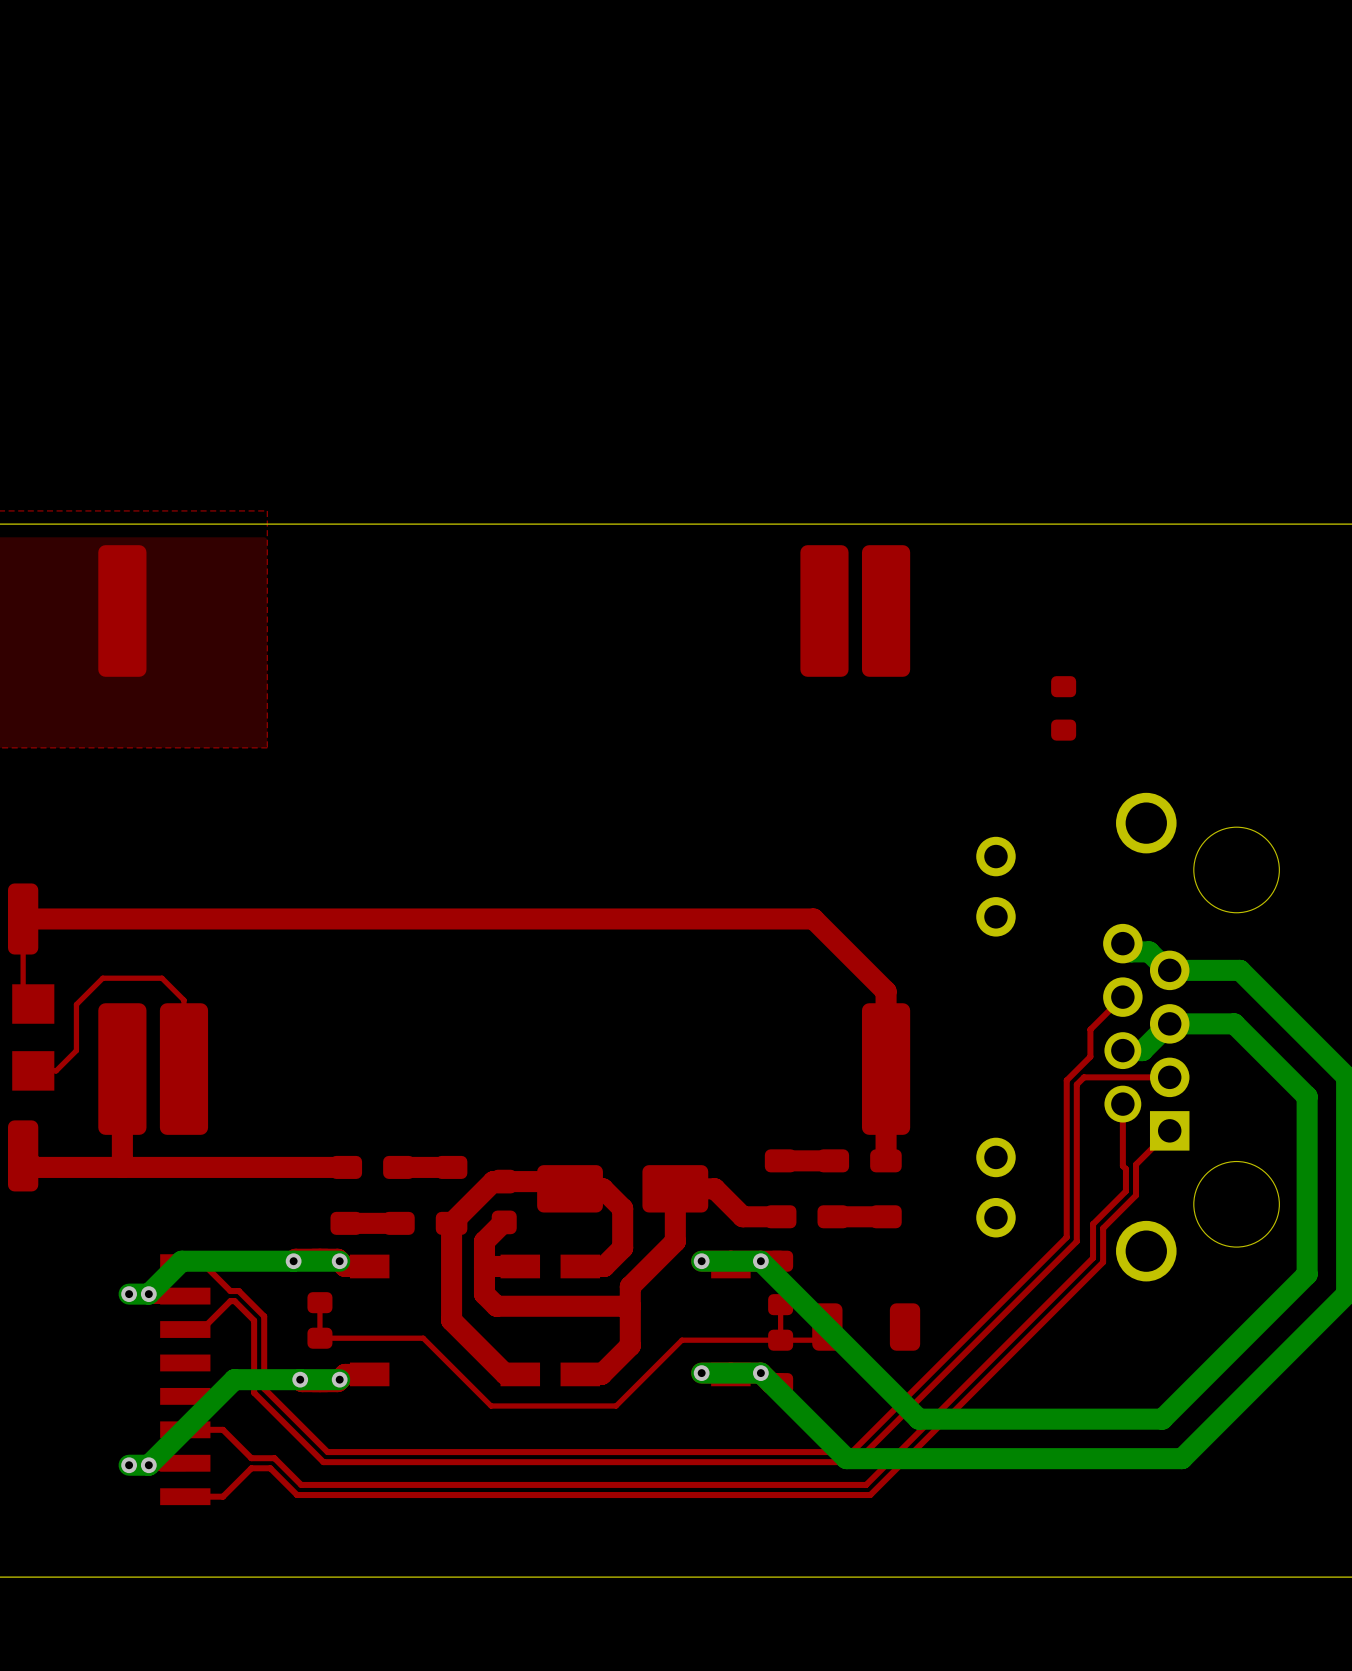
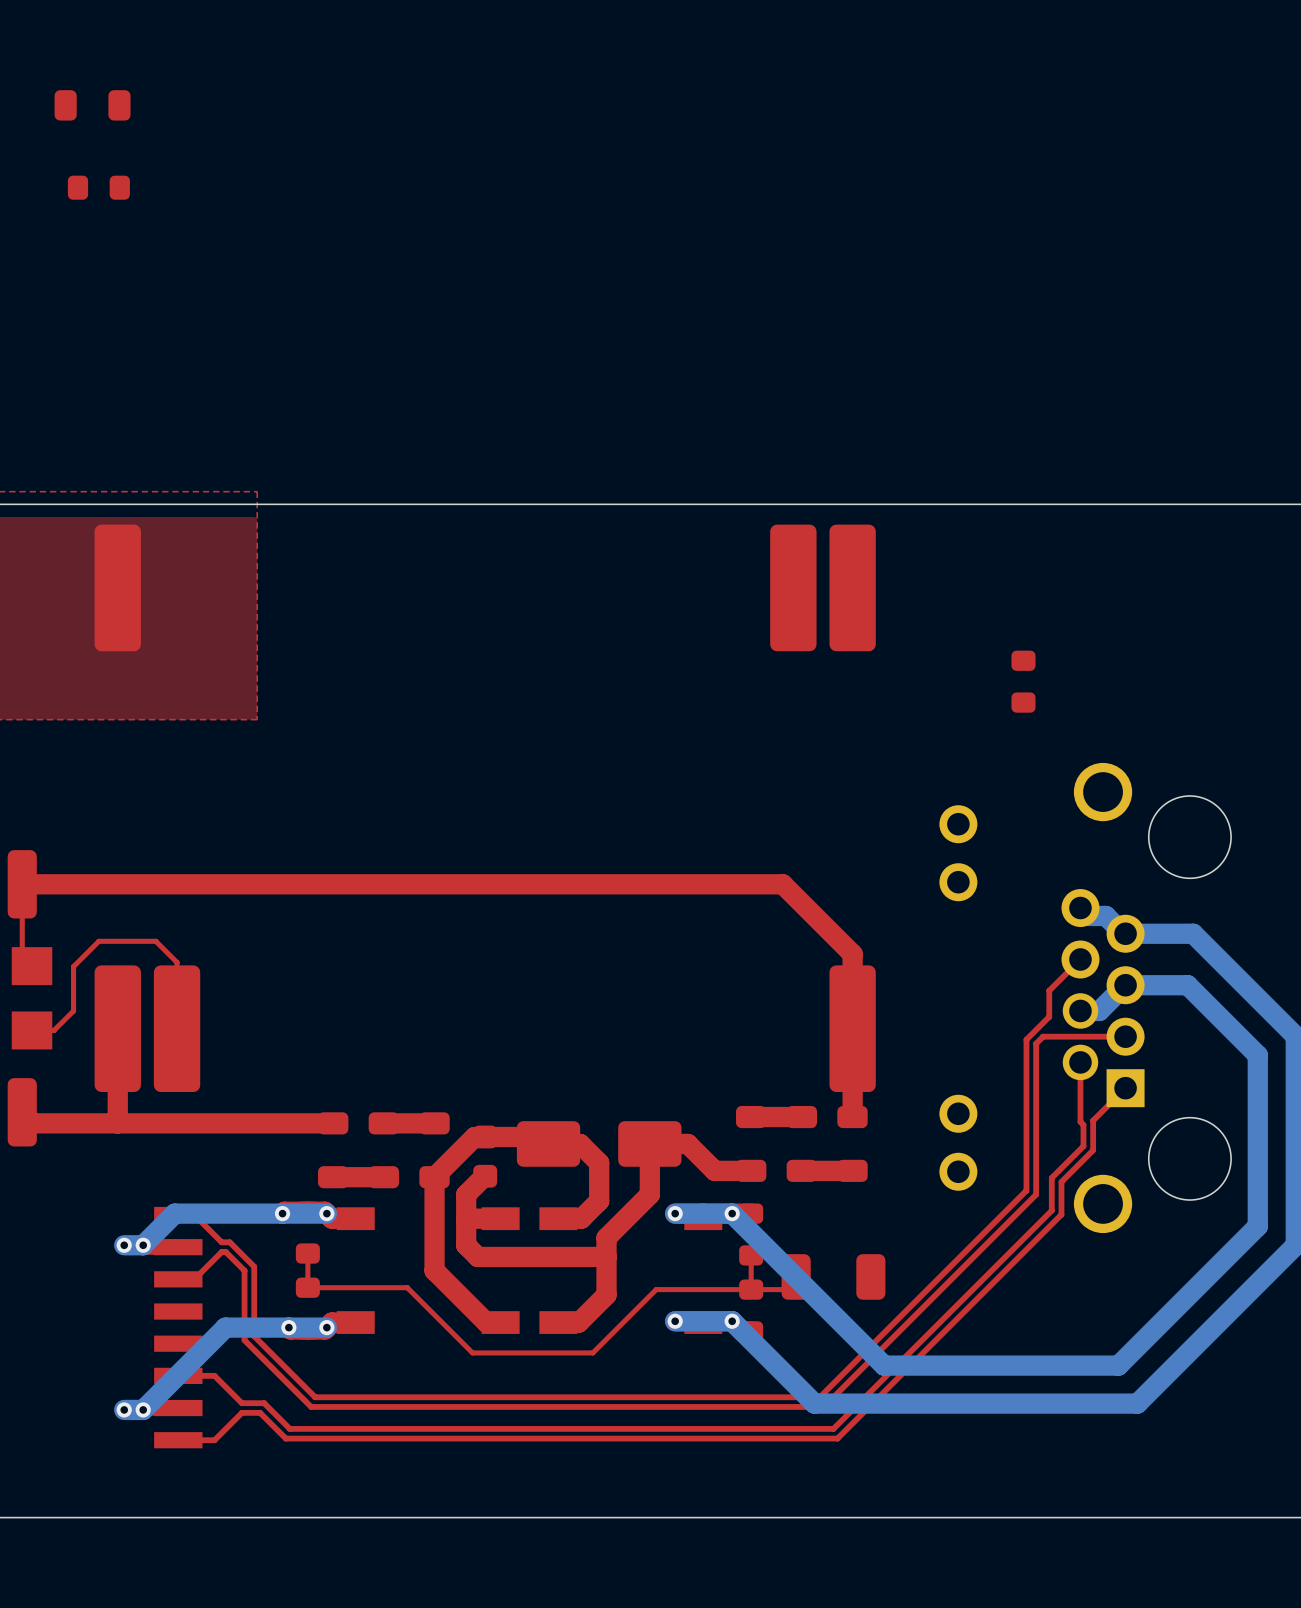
part: none -> (92, 105)
part: none -> (98, 187)

